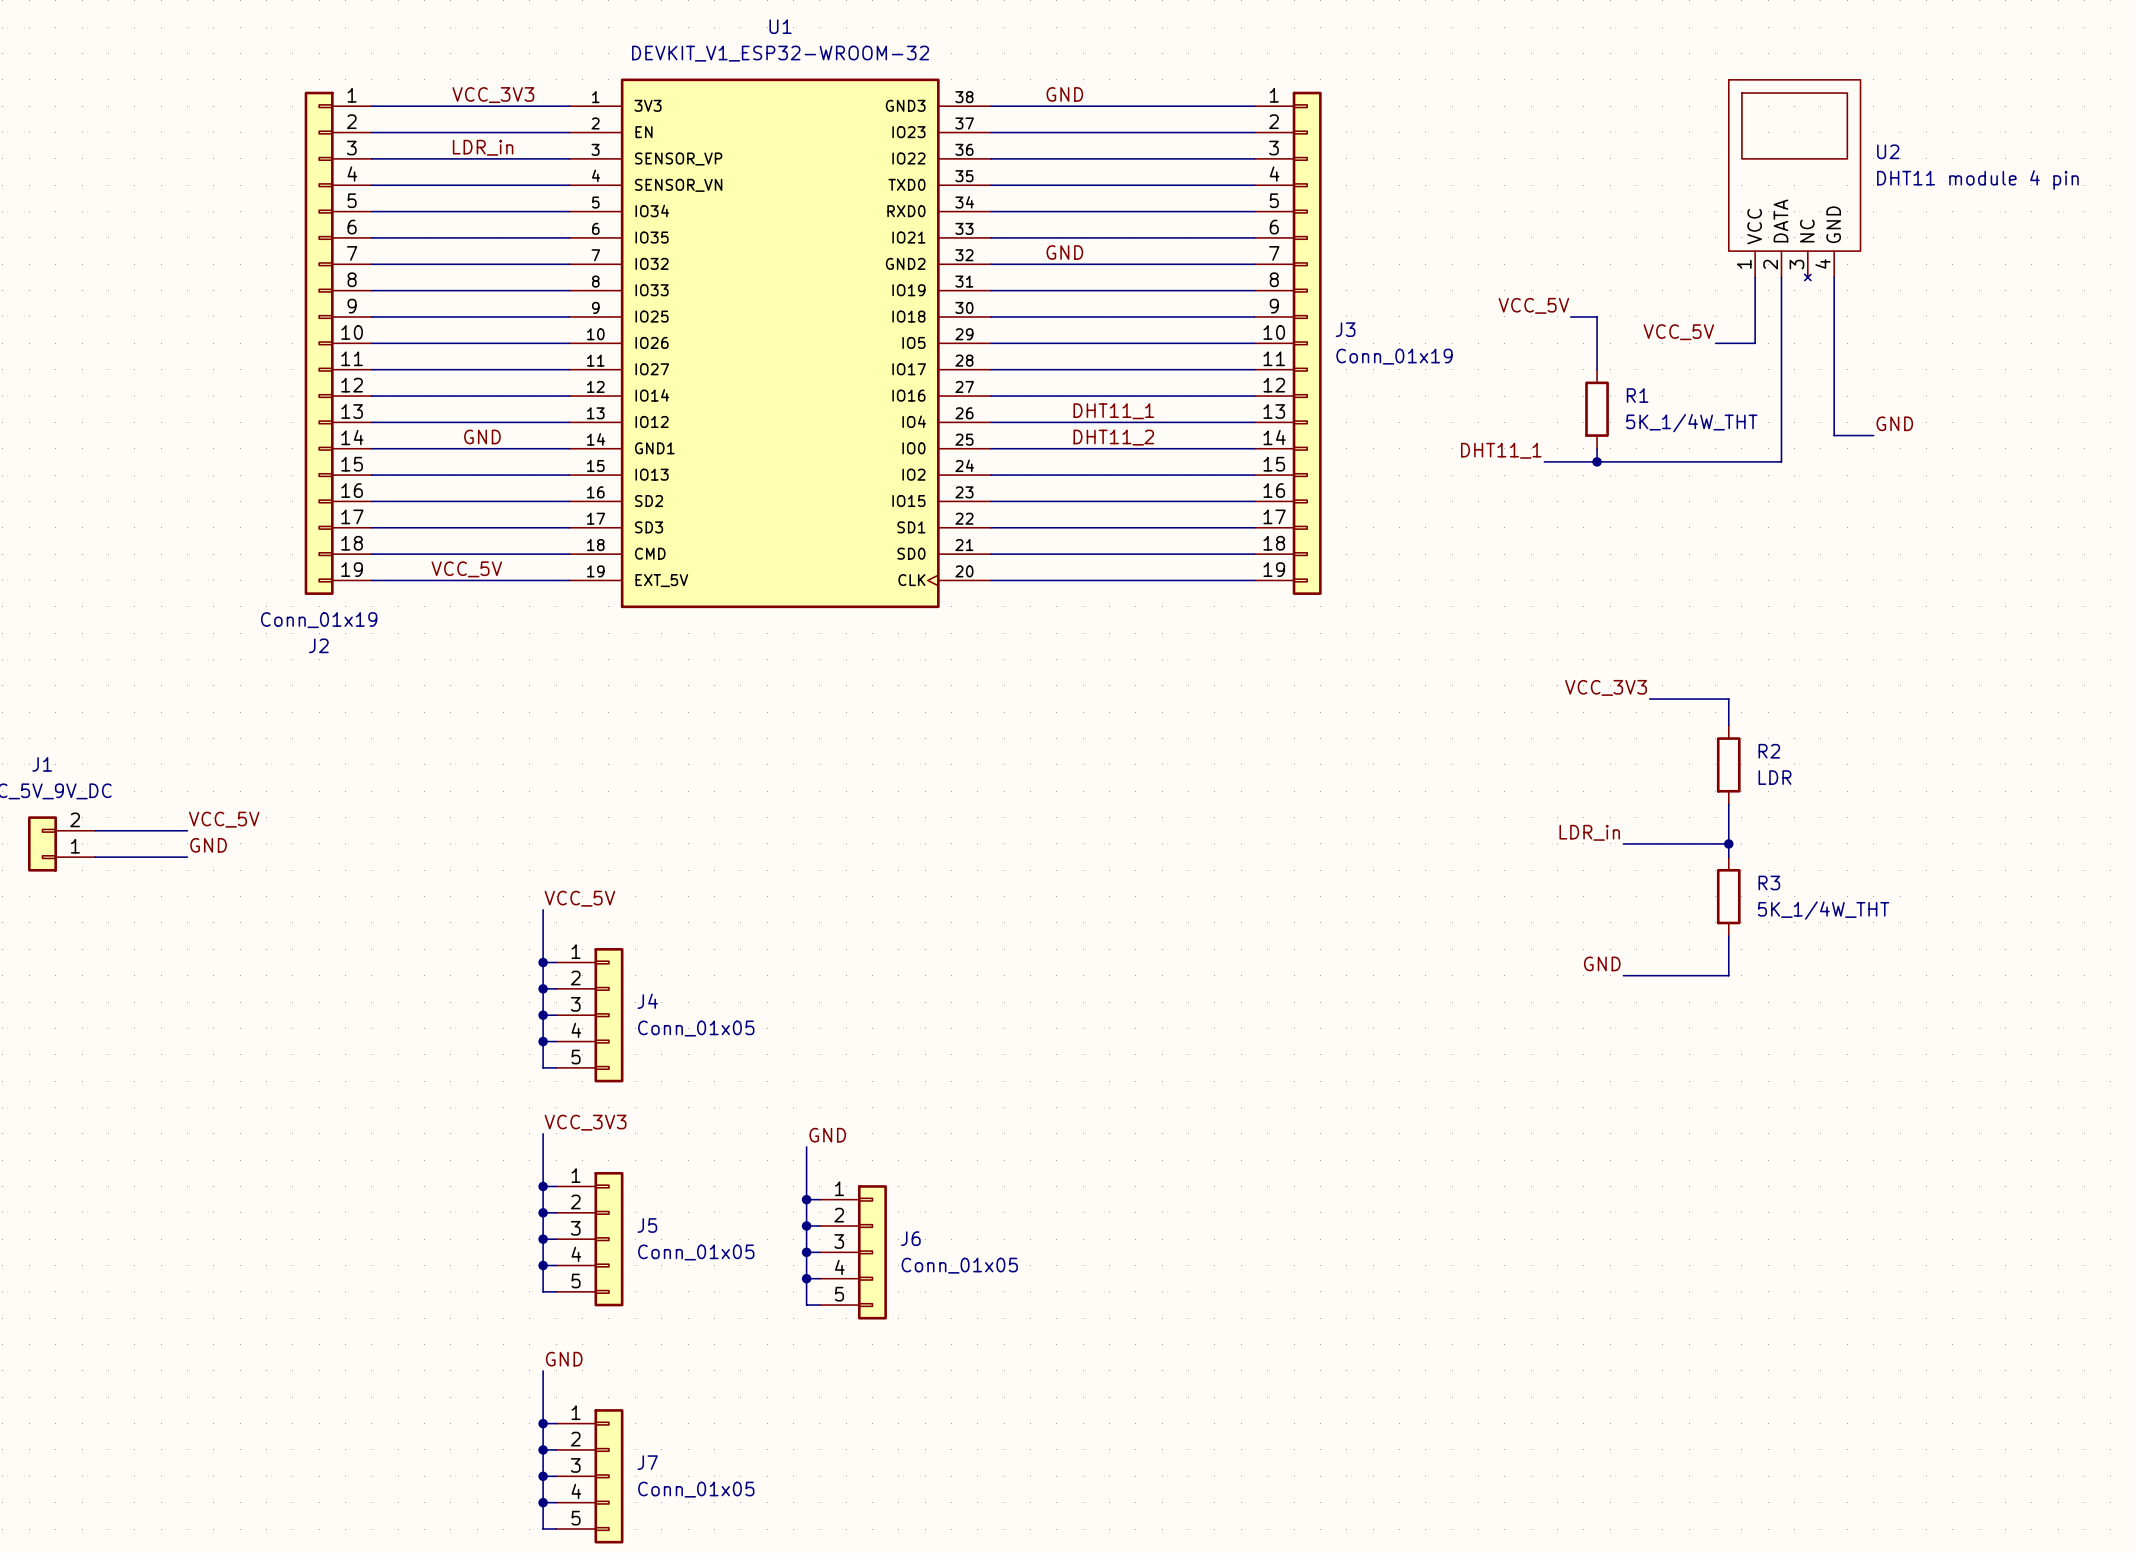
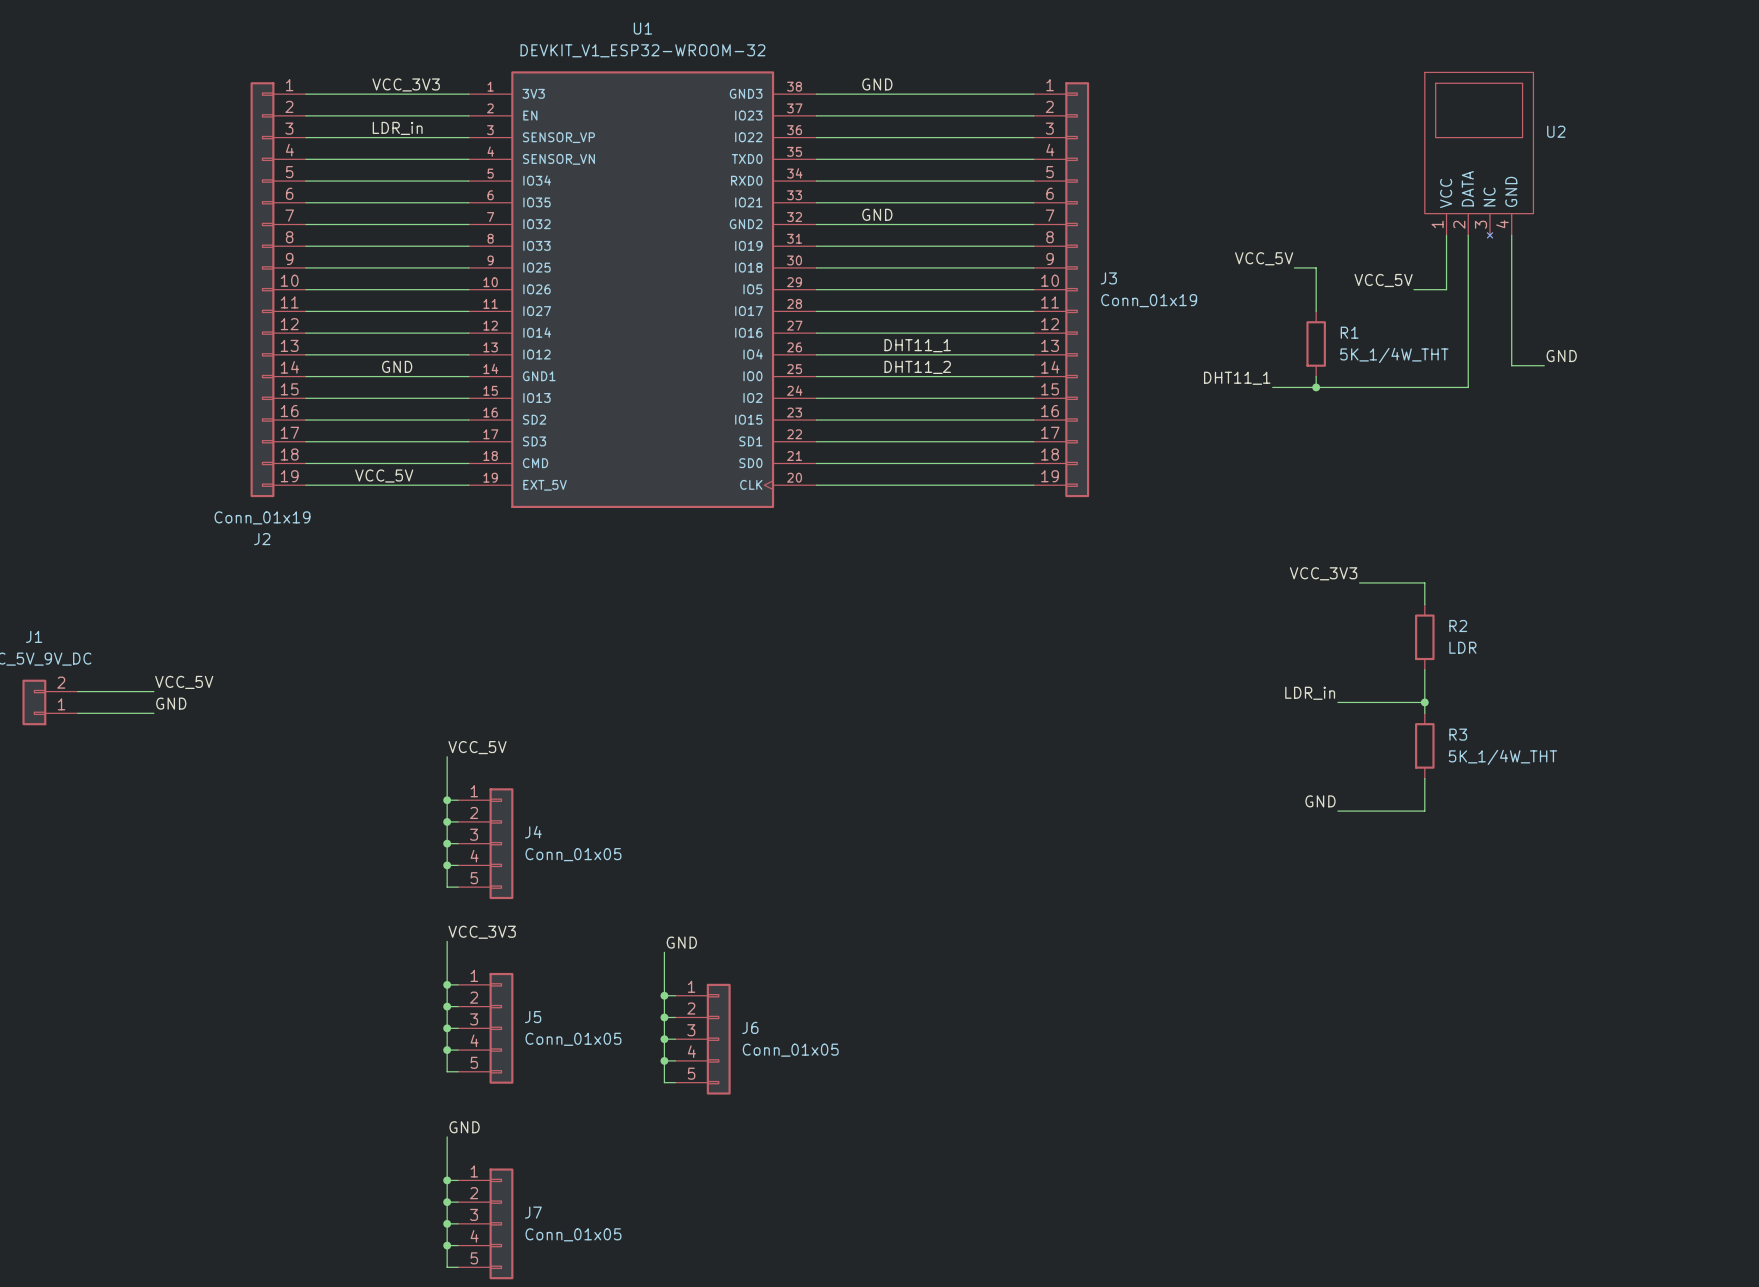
U2 value: DHT11 module 4 pin (1977, 180) -> none

